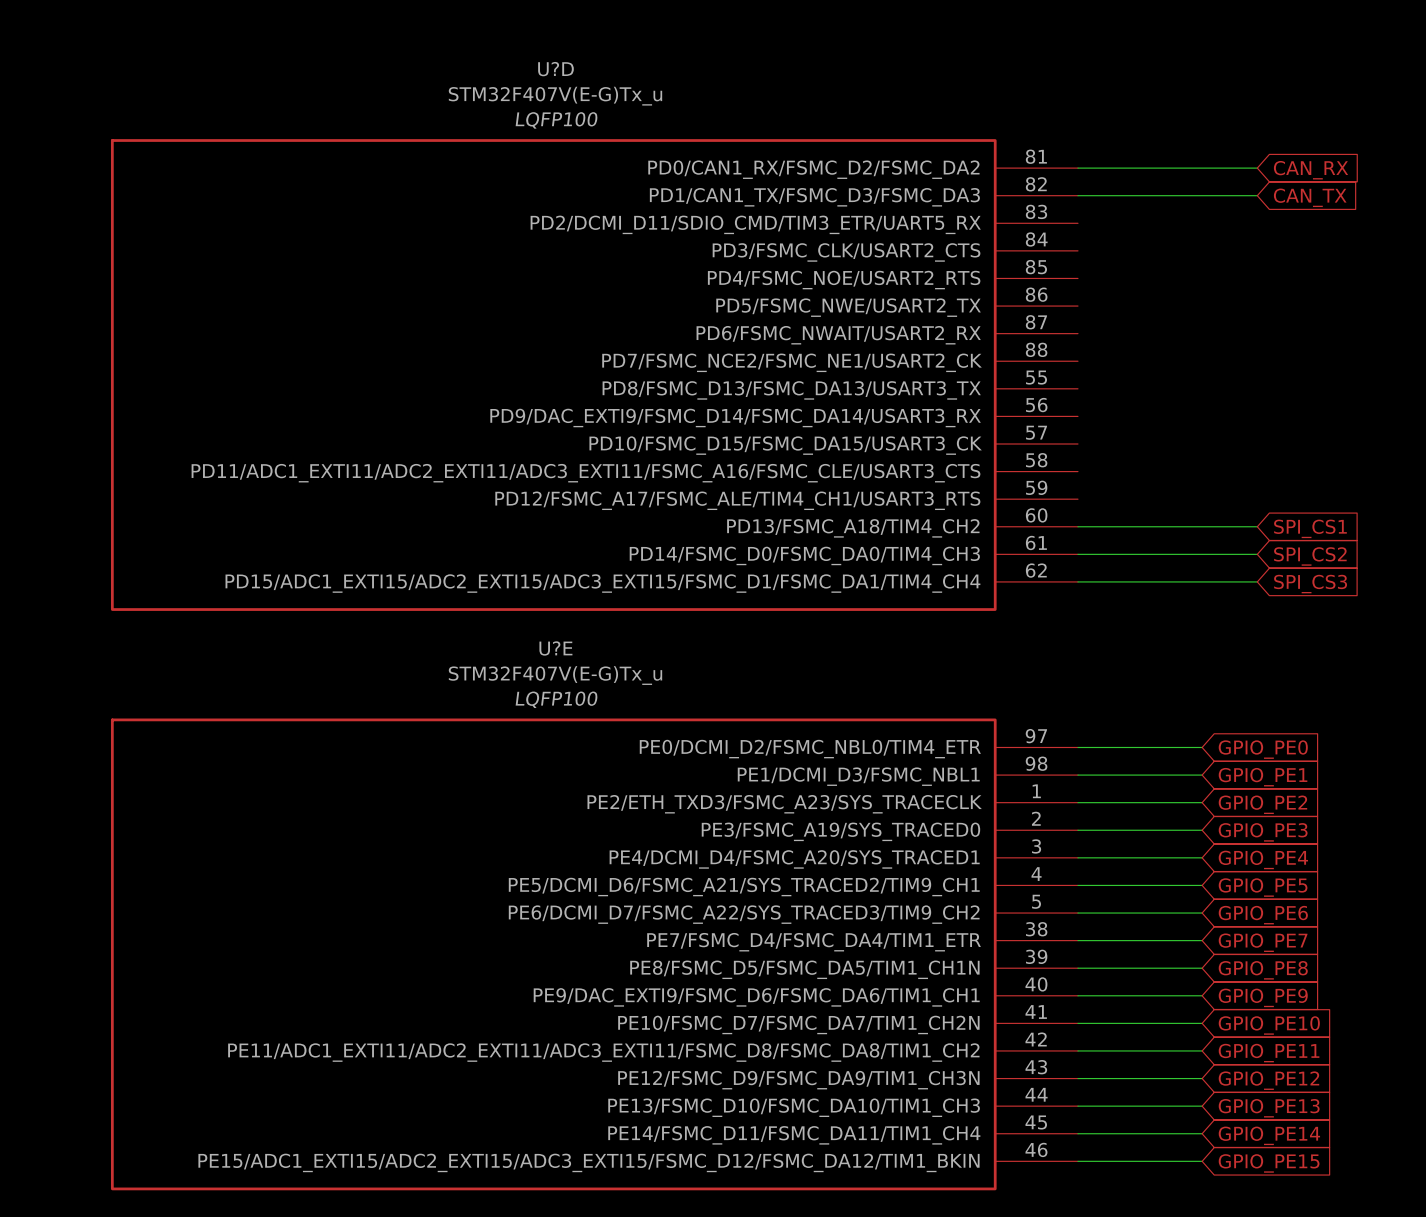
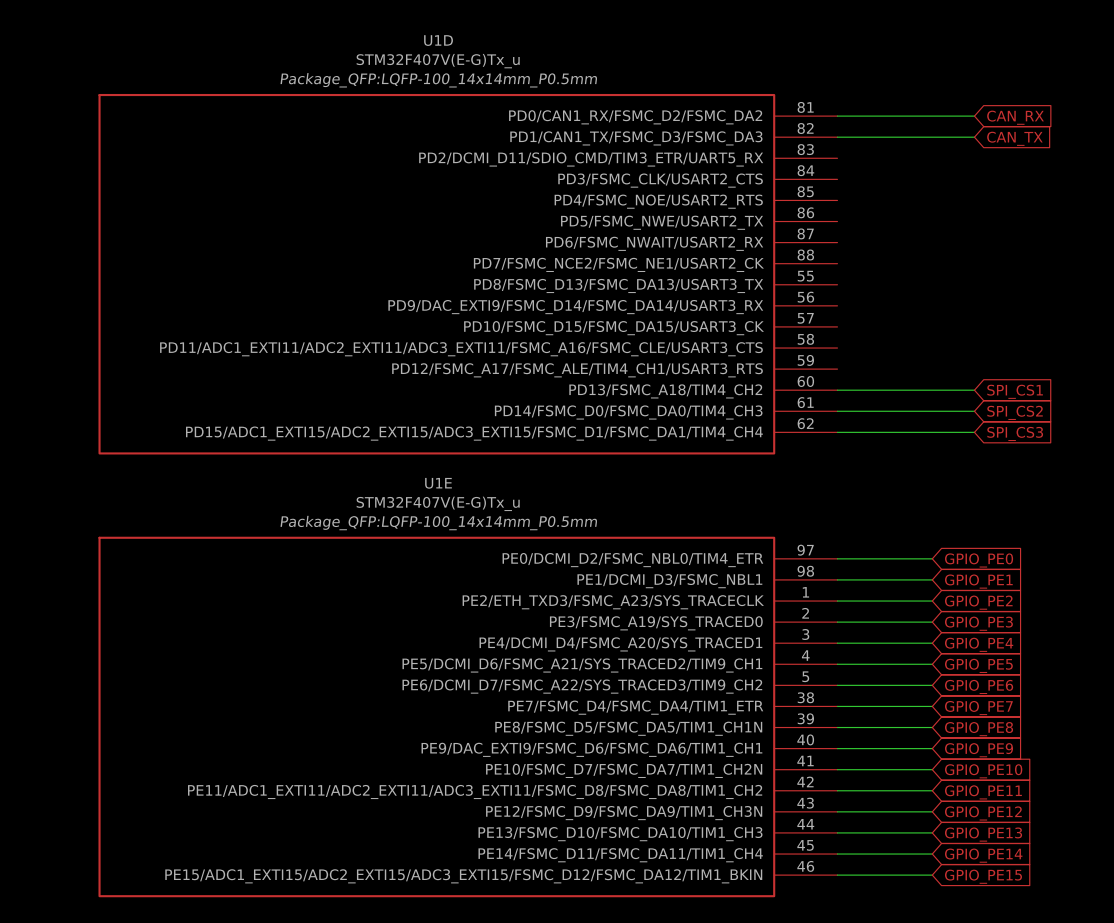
U?D name: U?D (555, 69) -> U1D (438, 40)
U?D text: LQFP100 (556, 120) -> Package_QFP:LQFP-100_14x14mm_P0.5mm (438, 80)
U?E name: U?E (555, 648) -> U1E (438, 483)
U?E text: LQFP100 (556, 699) -> Package_QFP:LQFP-100_14x14mm_P0.5mm (438, 523)

